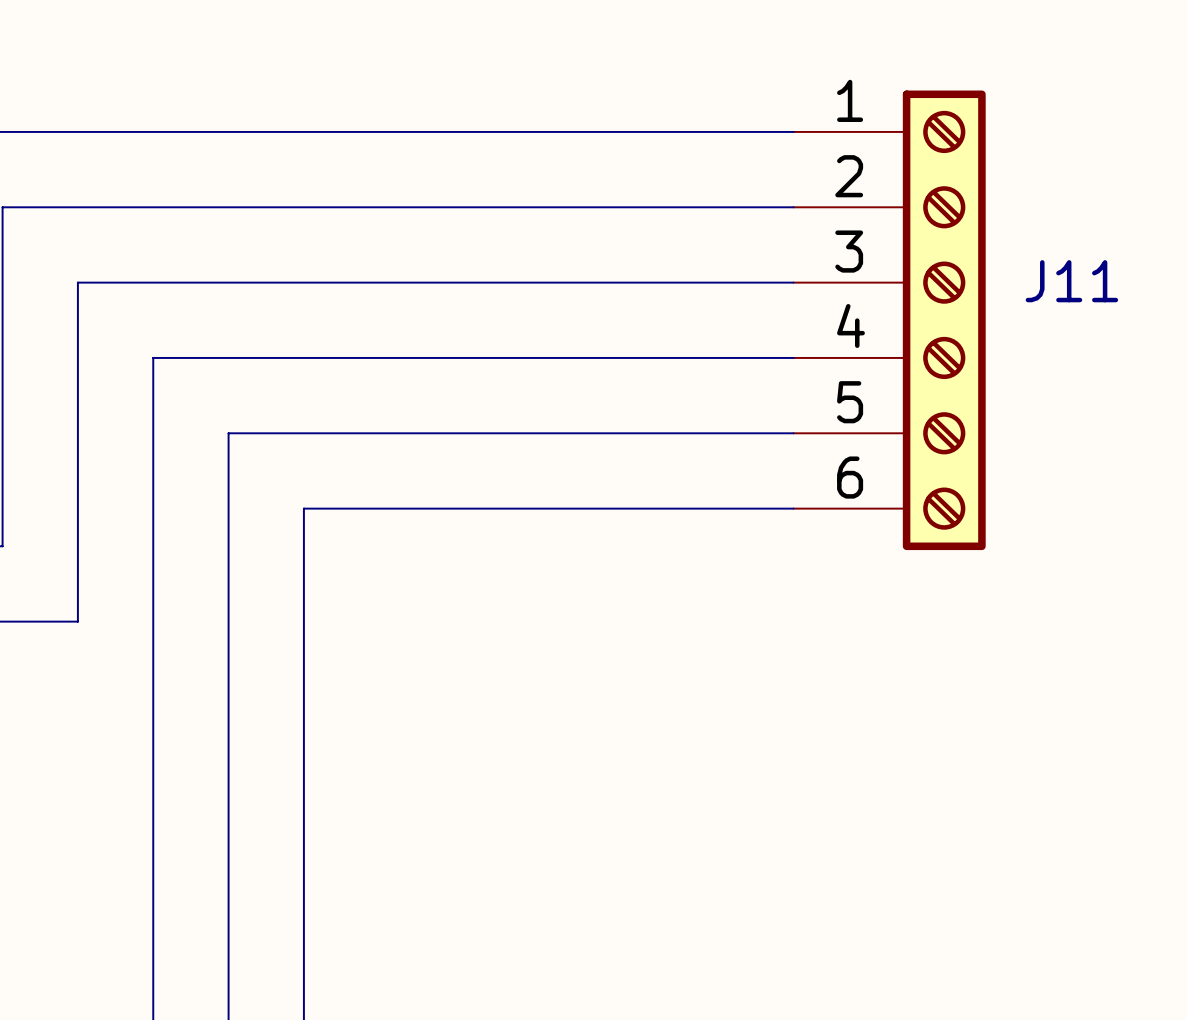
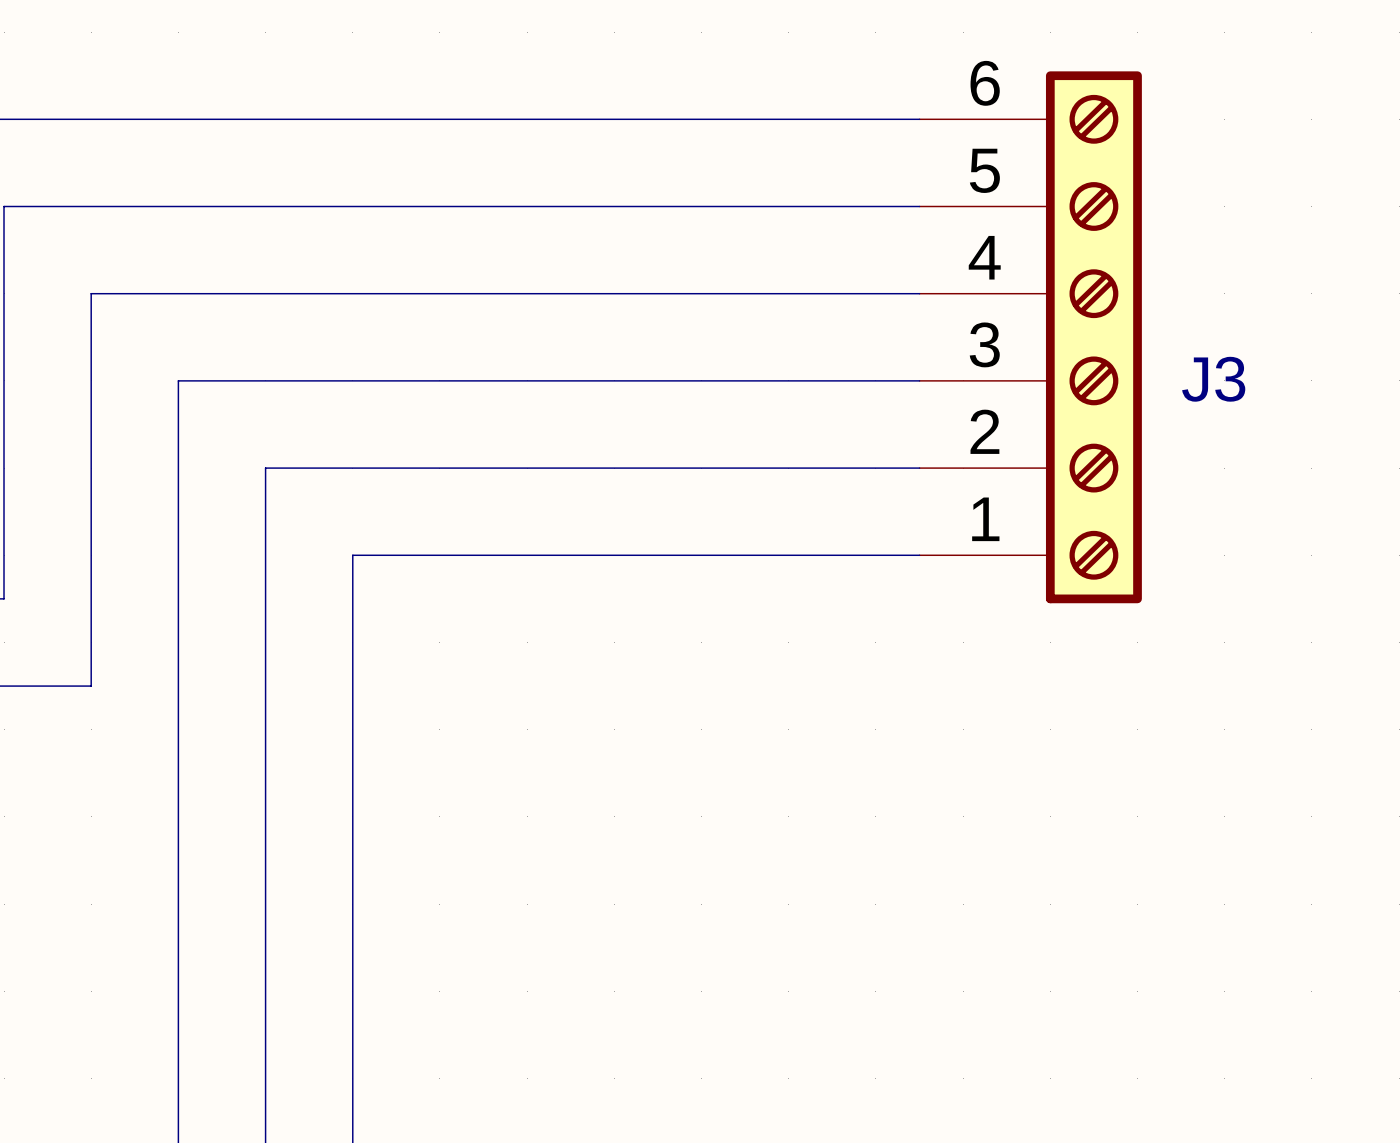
J11: (889, 320) -> none
J3: none -> (1030, 337)

